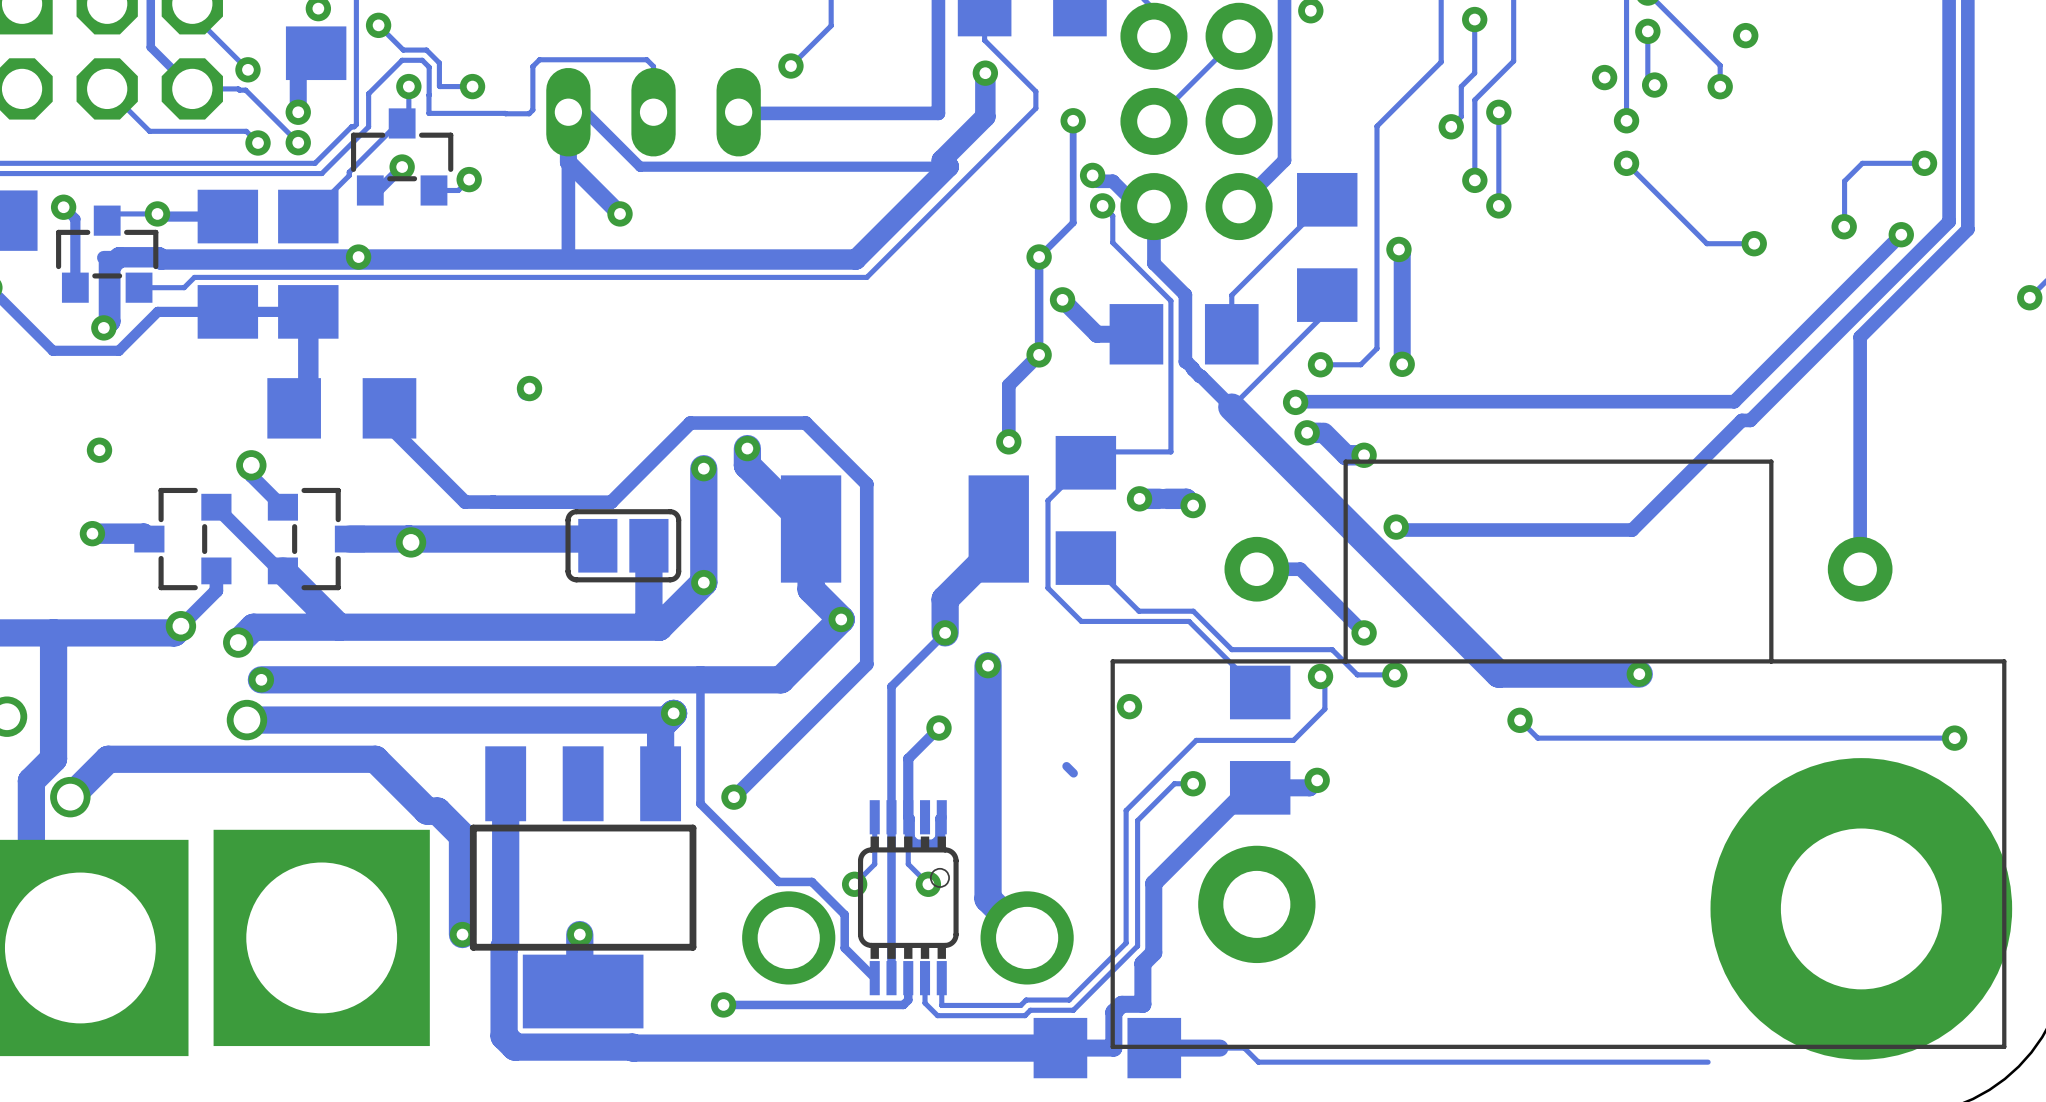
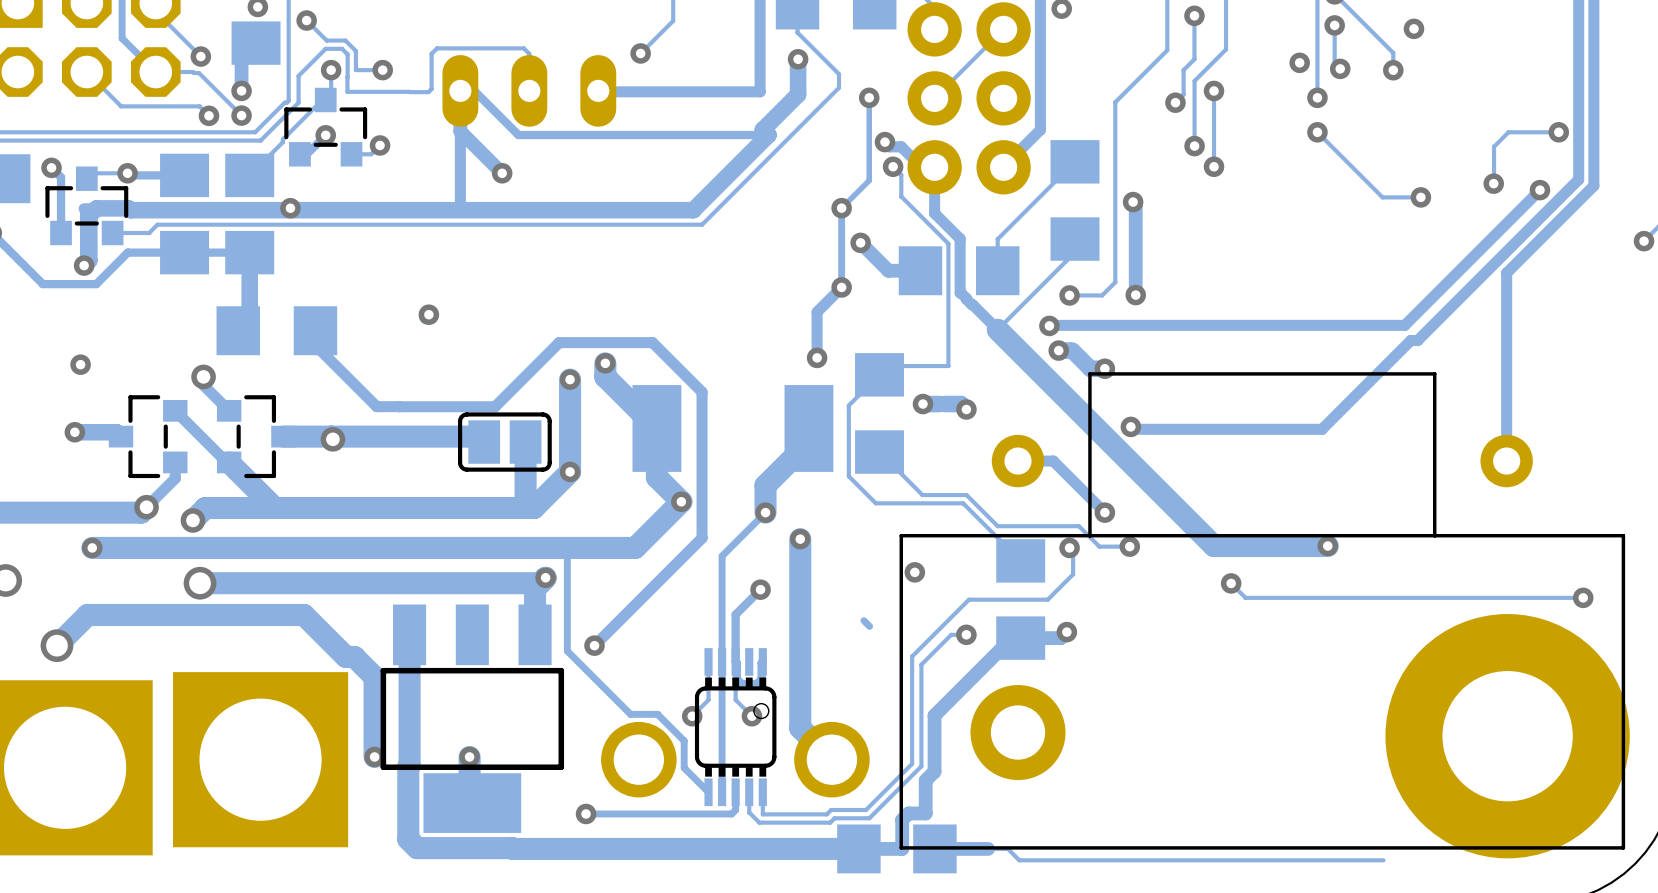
track: (53, 632) (53, 758) (31, 781) (31, 898) (80, 947) -> none
track: (784, 676) (780, 679) (261, 679) -> (635, 547) (92, 547)
via position: (261, 679) -> (92, 547)

